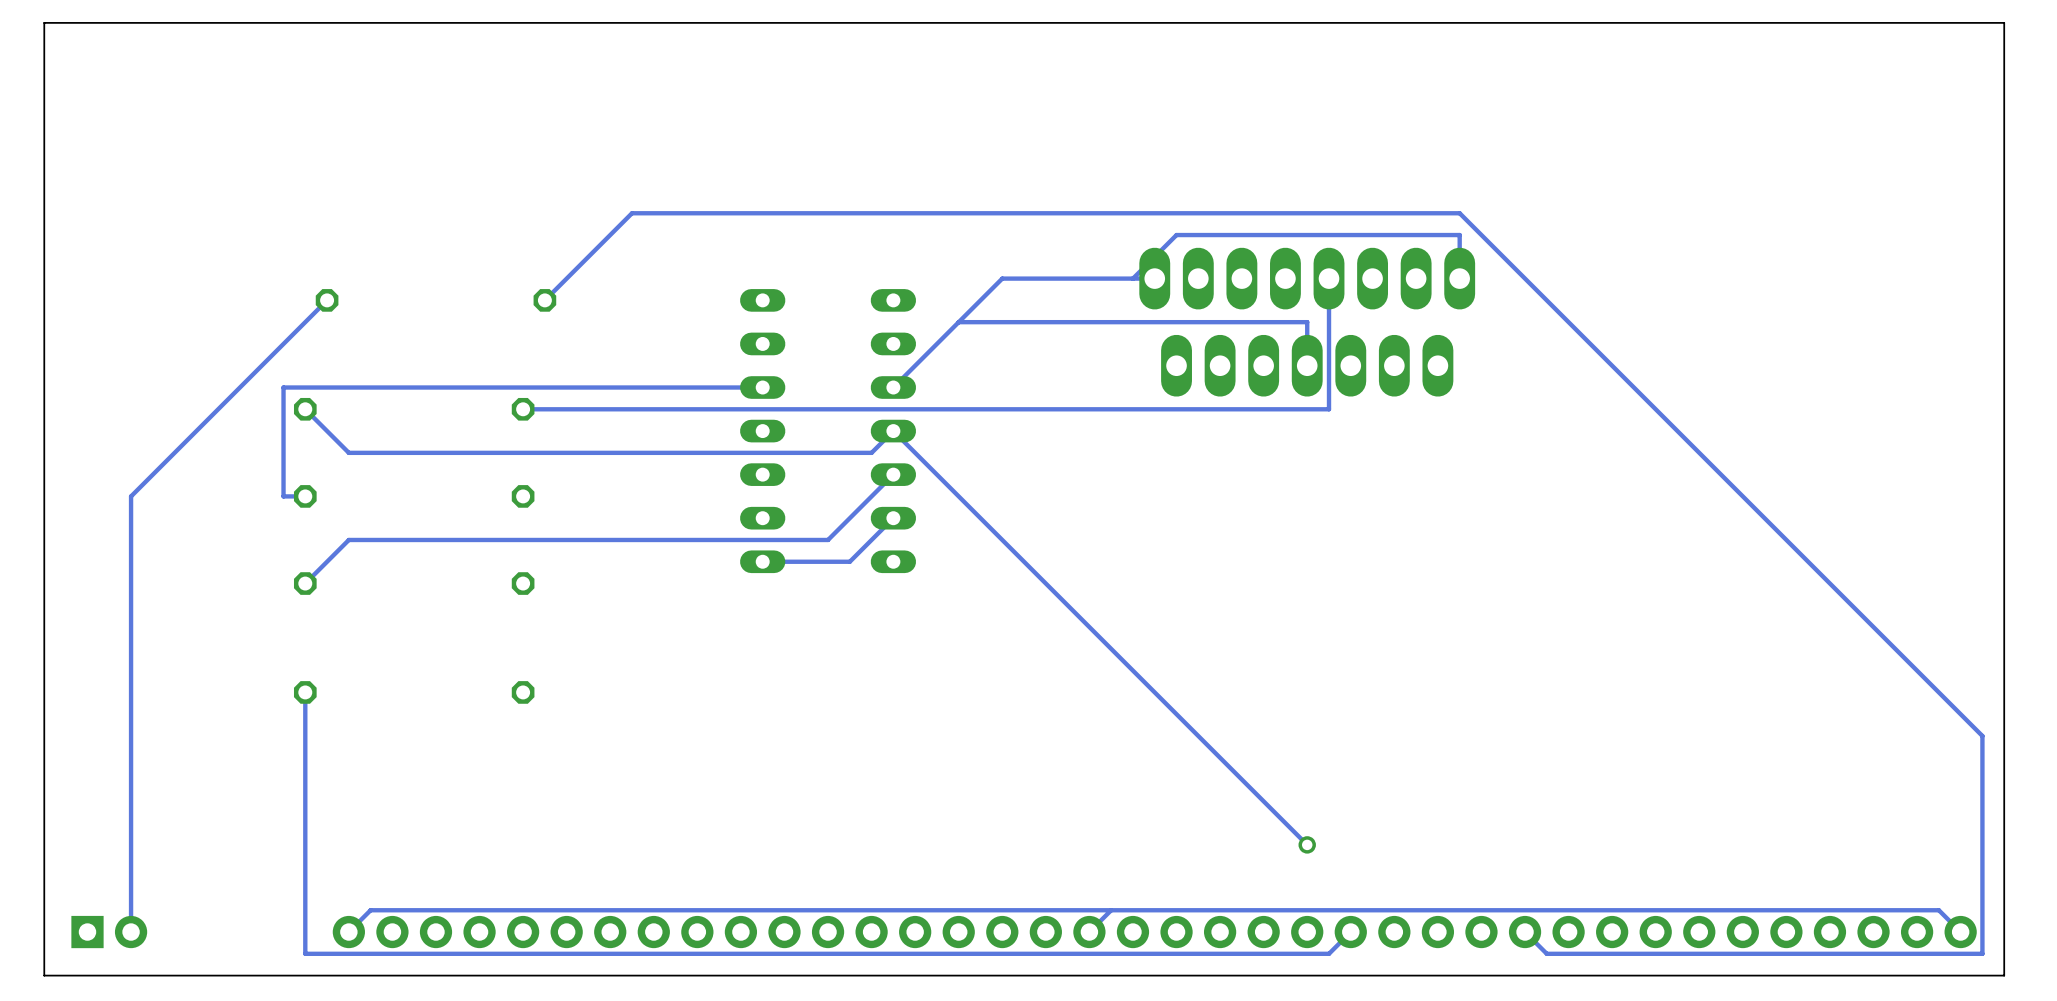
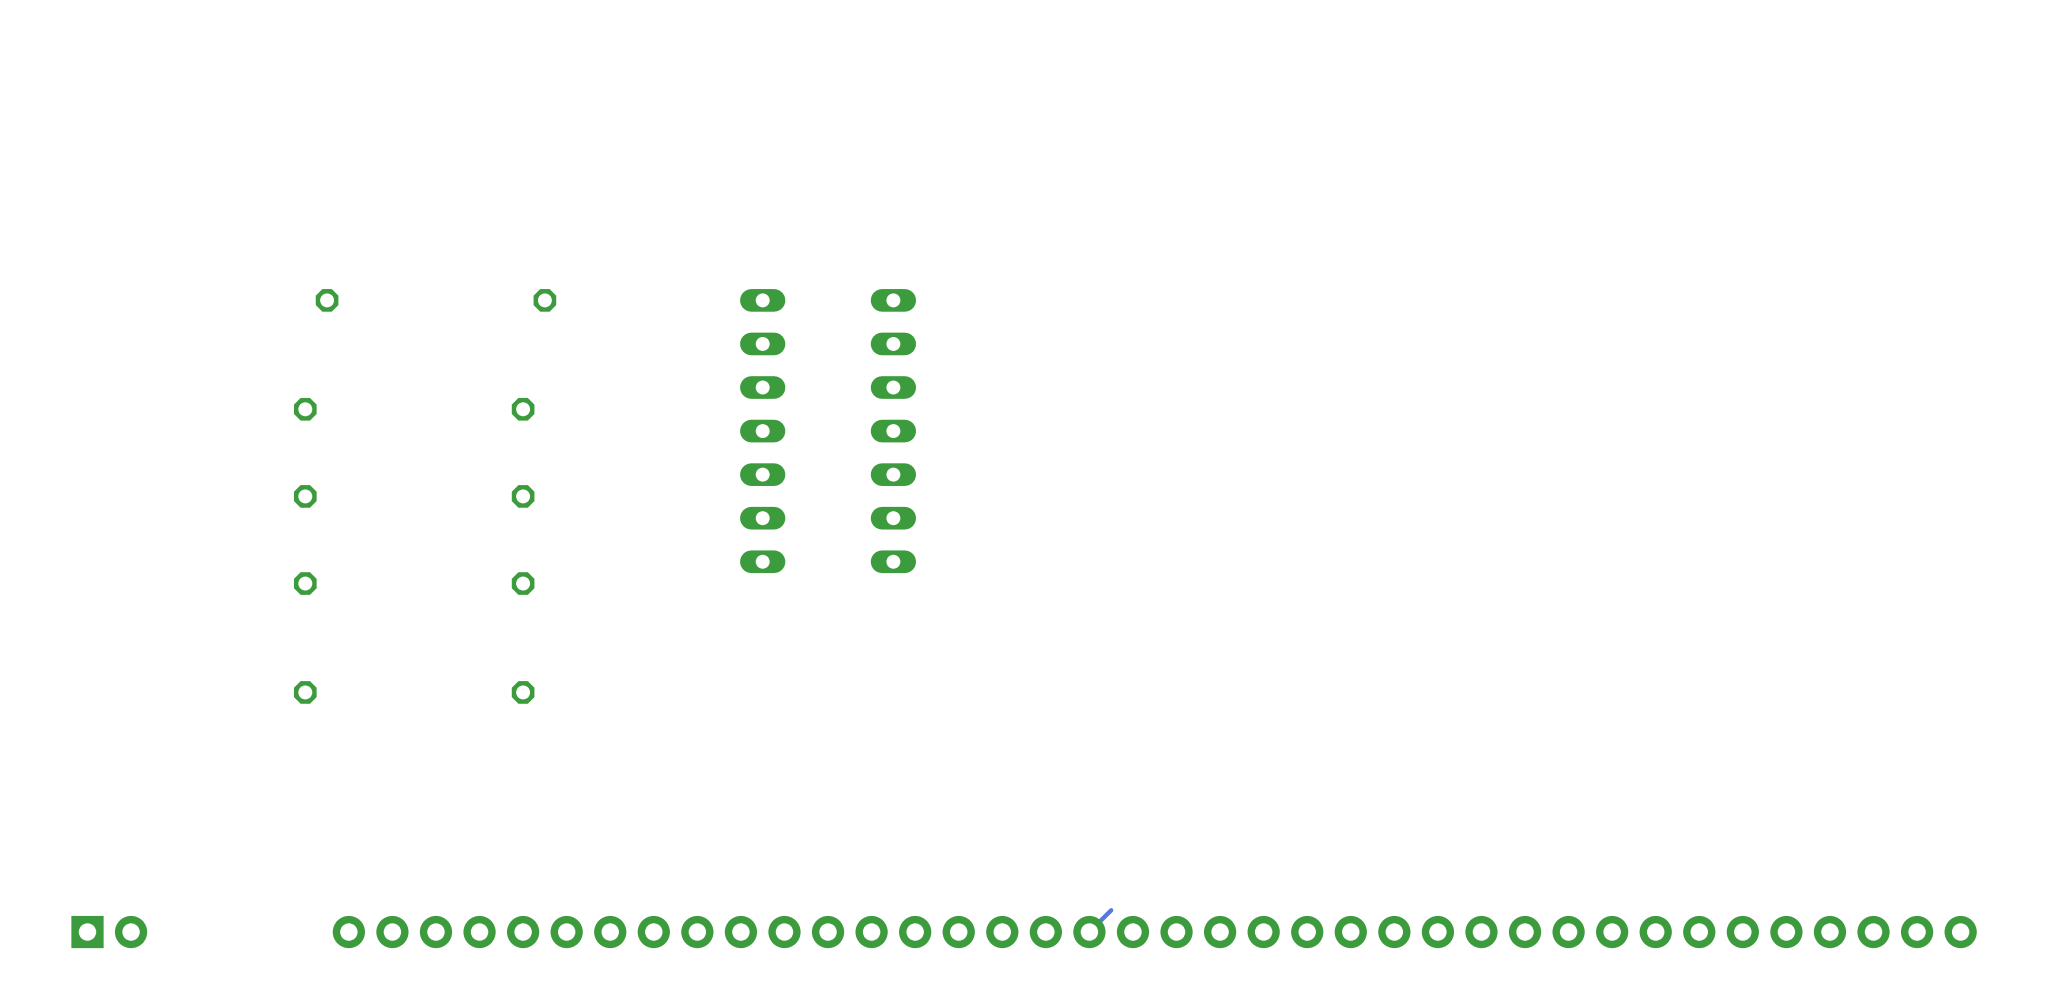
board edge: (2004, 22) (44, 22) (44, 975) (2004, 975) (2004, 22) -> none
track: (1154, 278) (1002, 278) (893, 387) -> none
track: (1329, 278) (1329, 409) (523, 409) -> none
track: (1459, 278) (1459, 235) (1176, 235) (1132, 278) -> none
track: (327, 300) (131, 496) (131, 932) -> none
track: (544, 300) (632, 213) (1459, 213) (1982, 736) (1982, 953) (1546, 953) (1525, 932) -> none
track: (958, 322) (1307, 322) (1307, 365) -> none
part: (1307, 322) -> none
track: (762, 387) (283, 387) (283, 496) (305, 496) -> none
track: (305, 409) (348, 452) (871, 452) (893, 431) (1307, 844) -> none
track: (893, 474) (828, 539) (348, 539) (305, 583) -> none
track: (893, 518) (849, 561) (762, 561) -> none
track: (305, 692) (305, 953) (1329, 953) (1350, 932) -> none
via: (1307, 844) -> none
track: (1960, 932) (1938, 910) (370, 910) (348, 932) -> none

